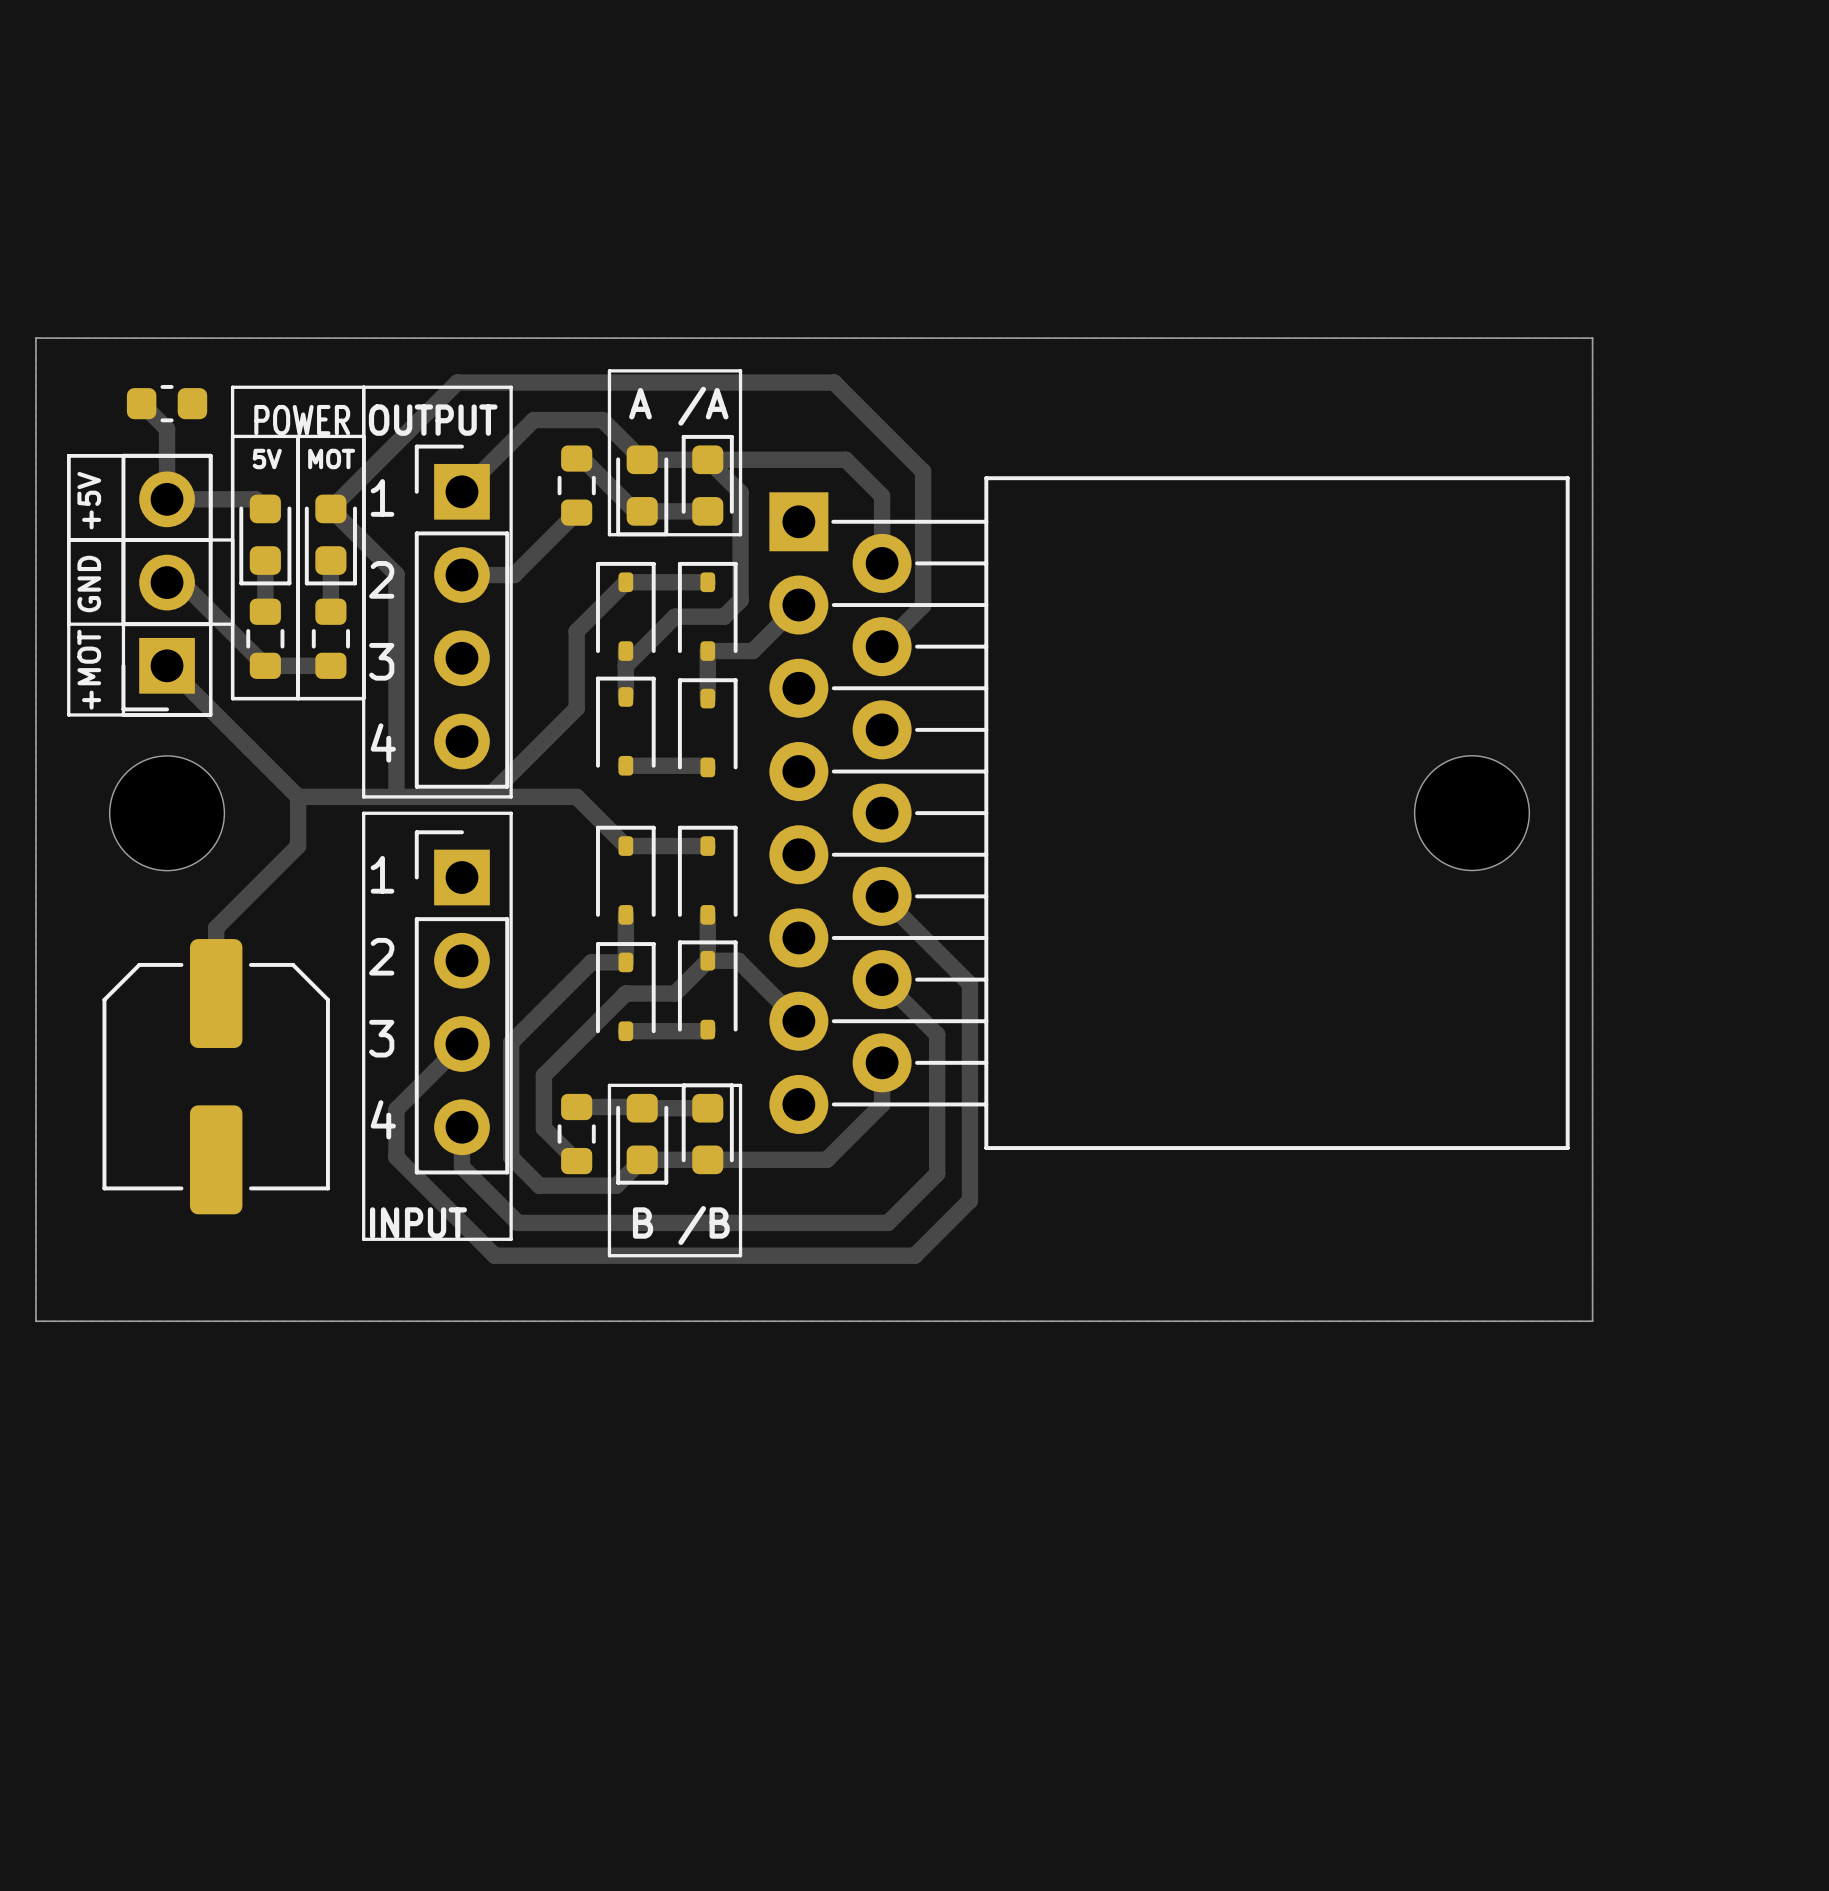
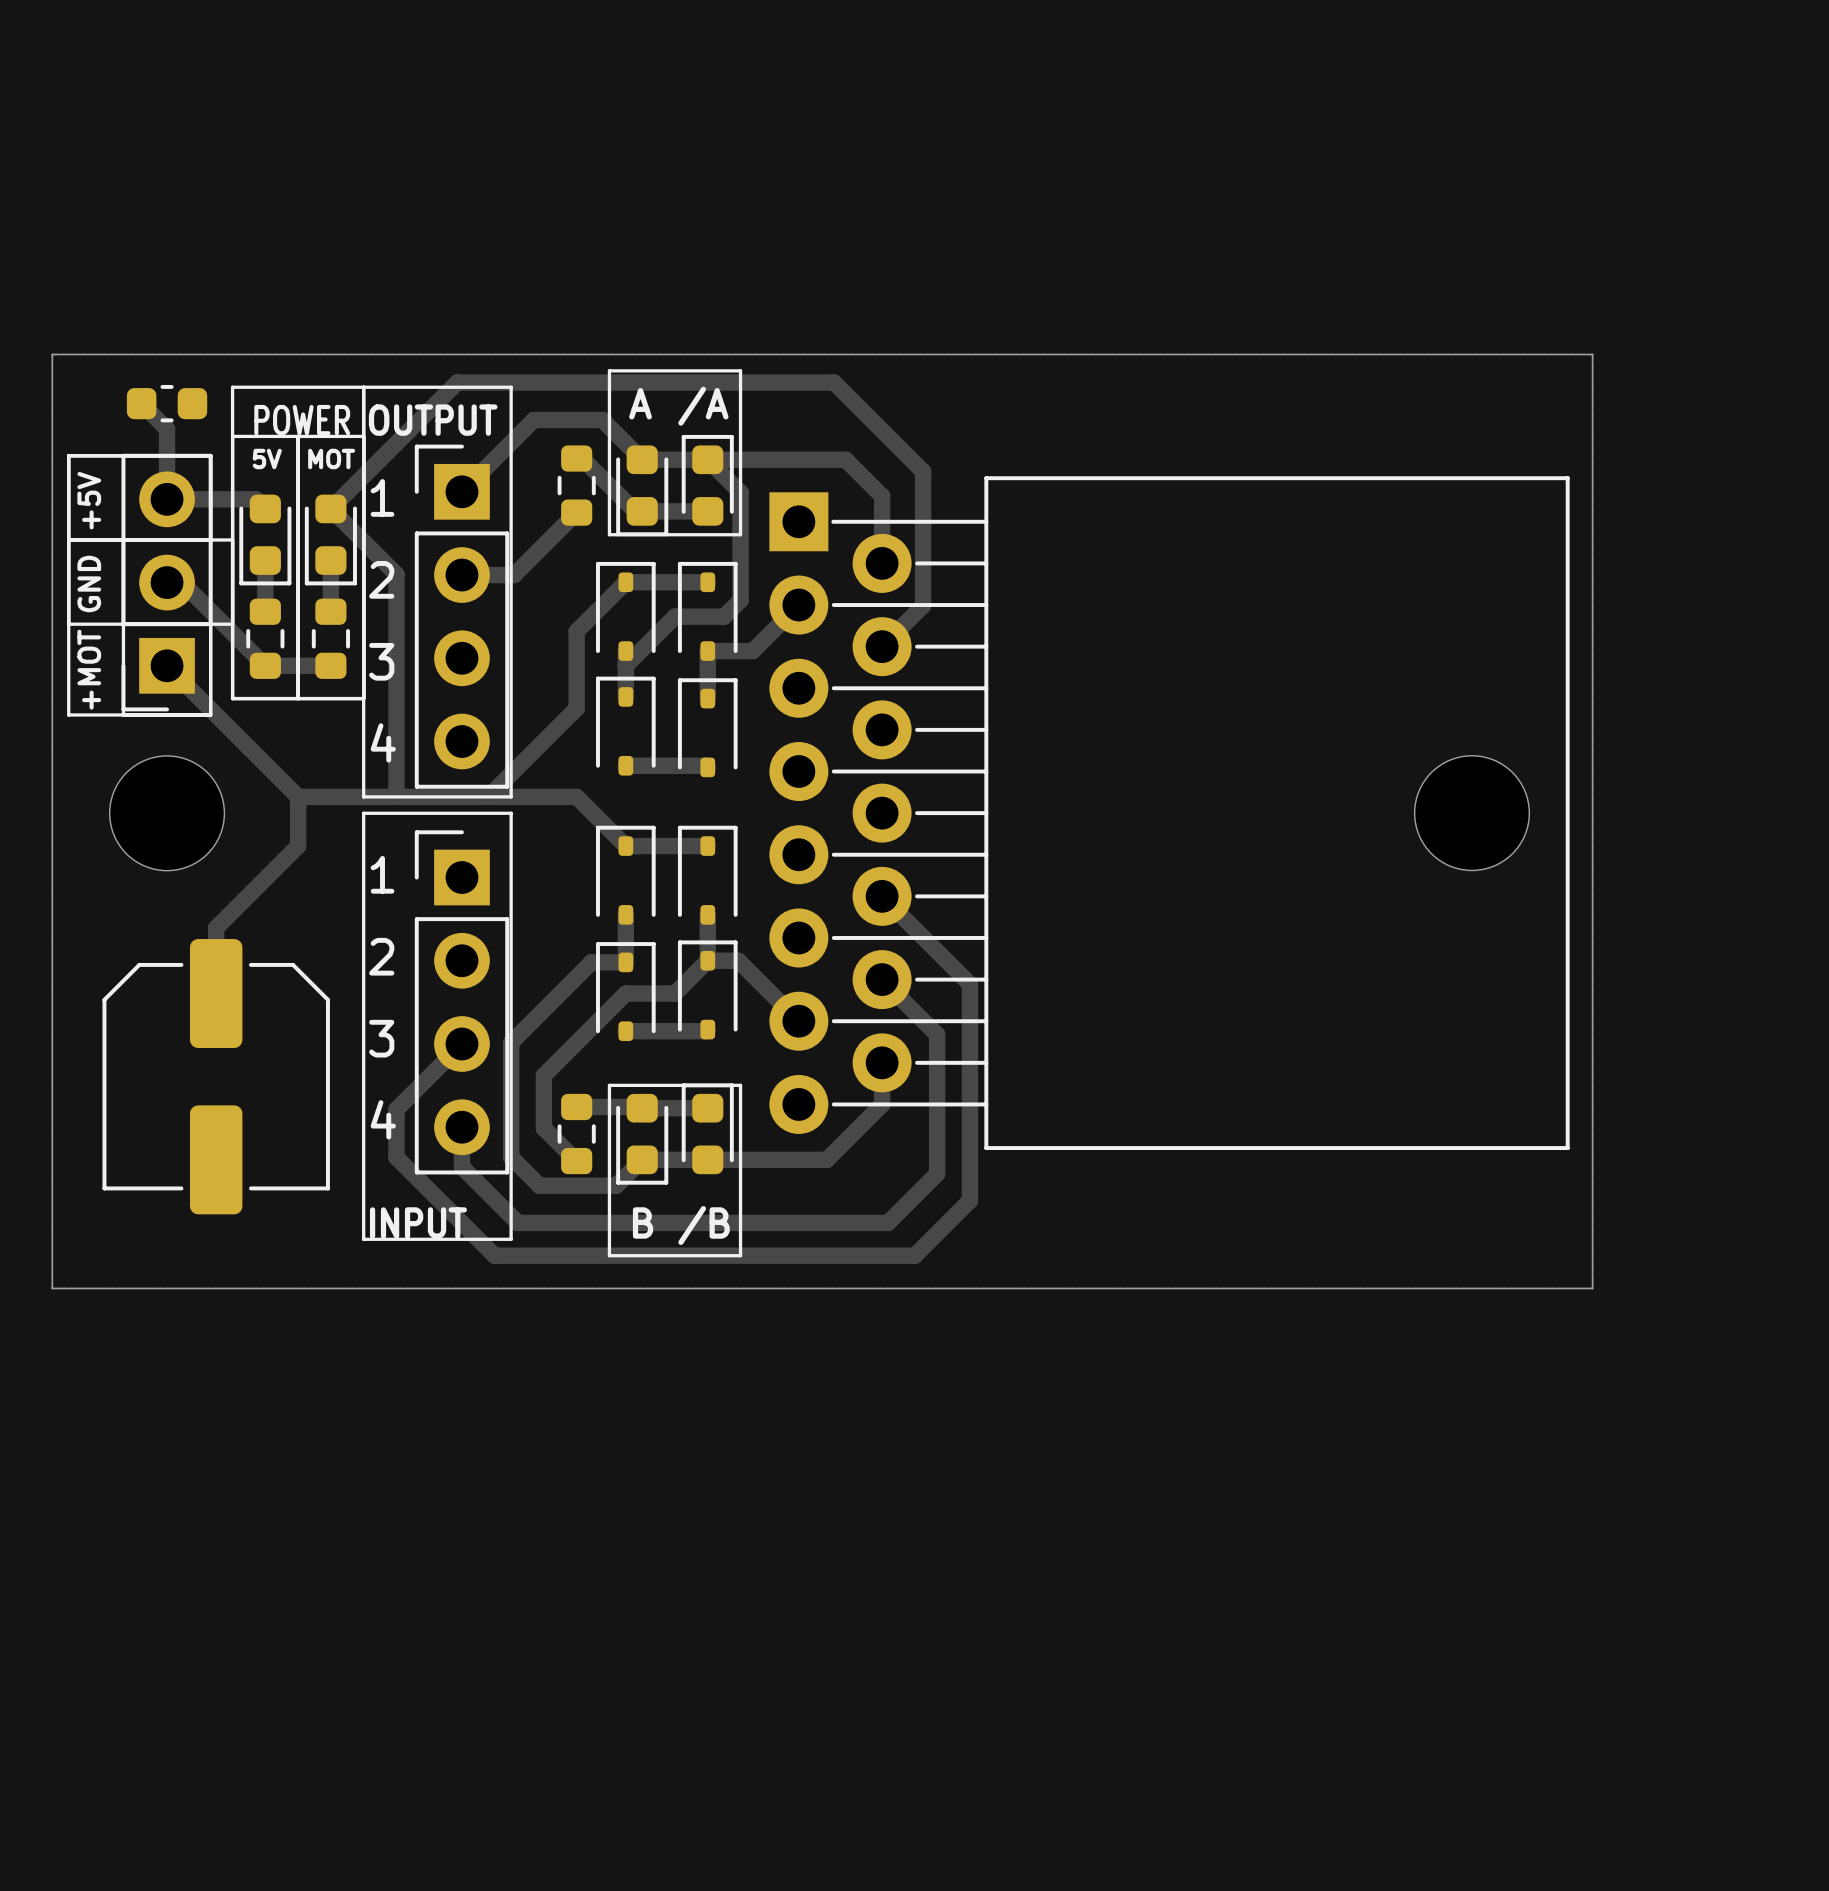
board edge: (1592, 354) (1592, 338) (35, 338) (35, 1321) (1592, 1321) (1592, 1288) -> (1592, 354) (52, 354) (52, 1288) (1592, 1288)

